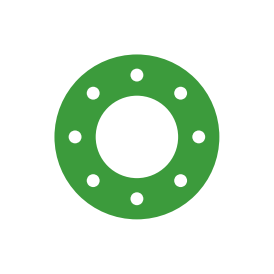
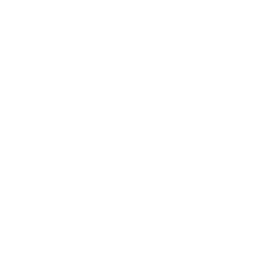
part: (136, 136) -> none

